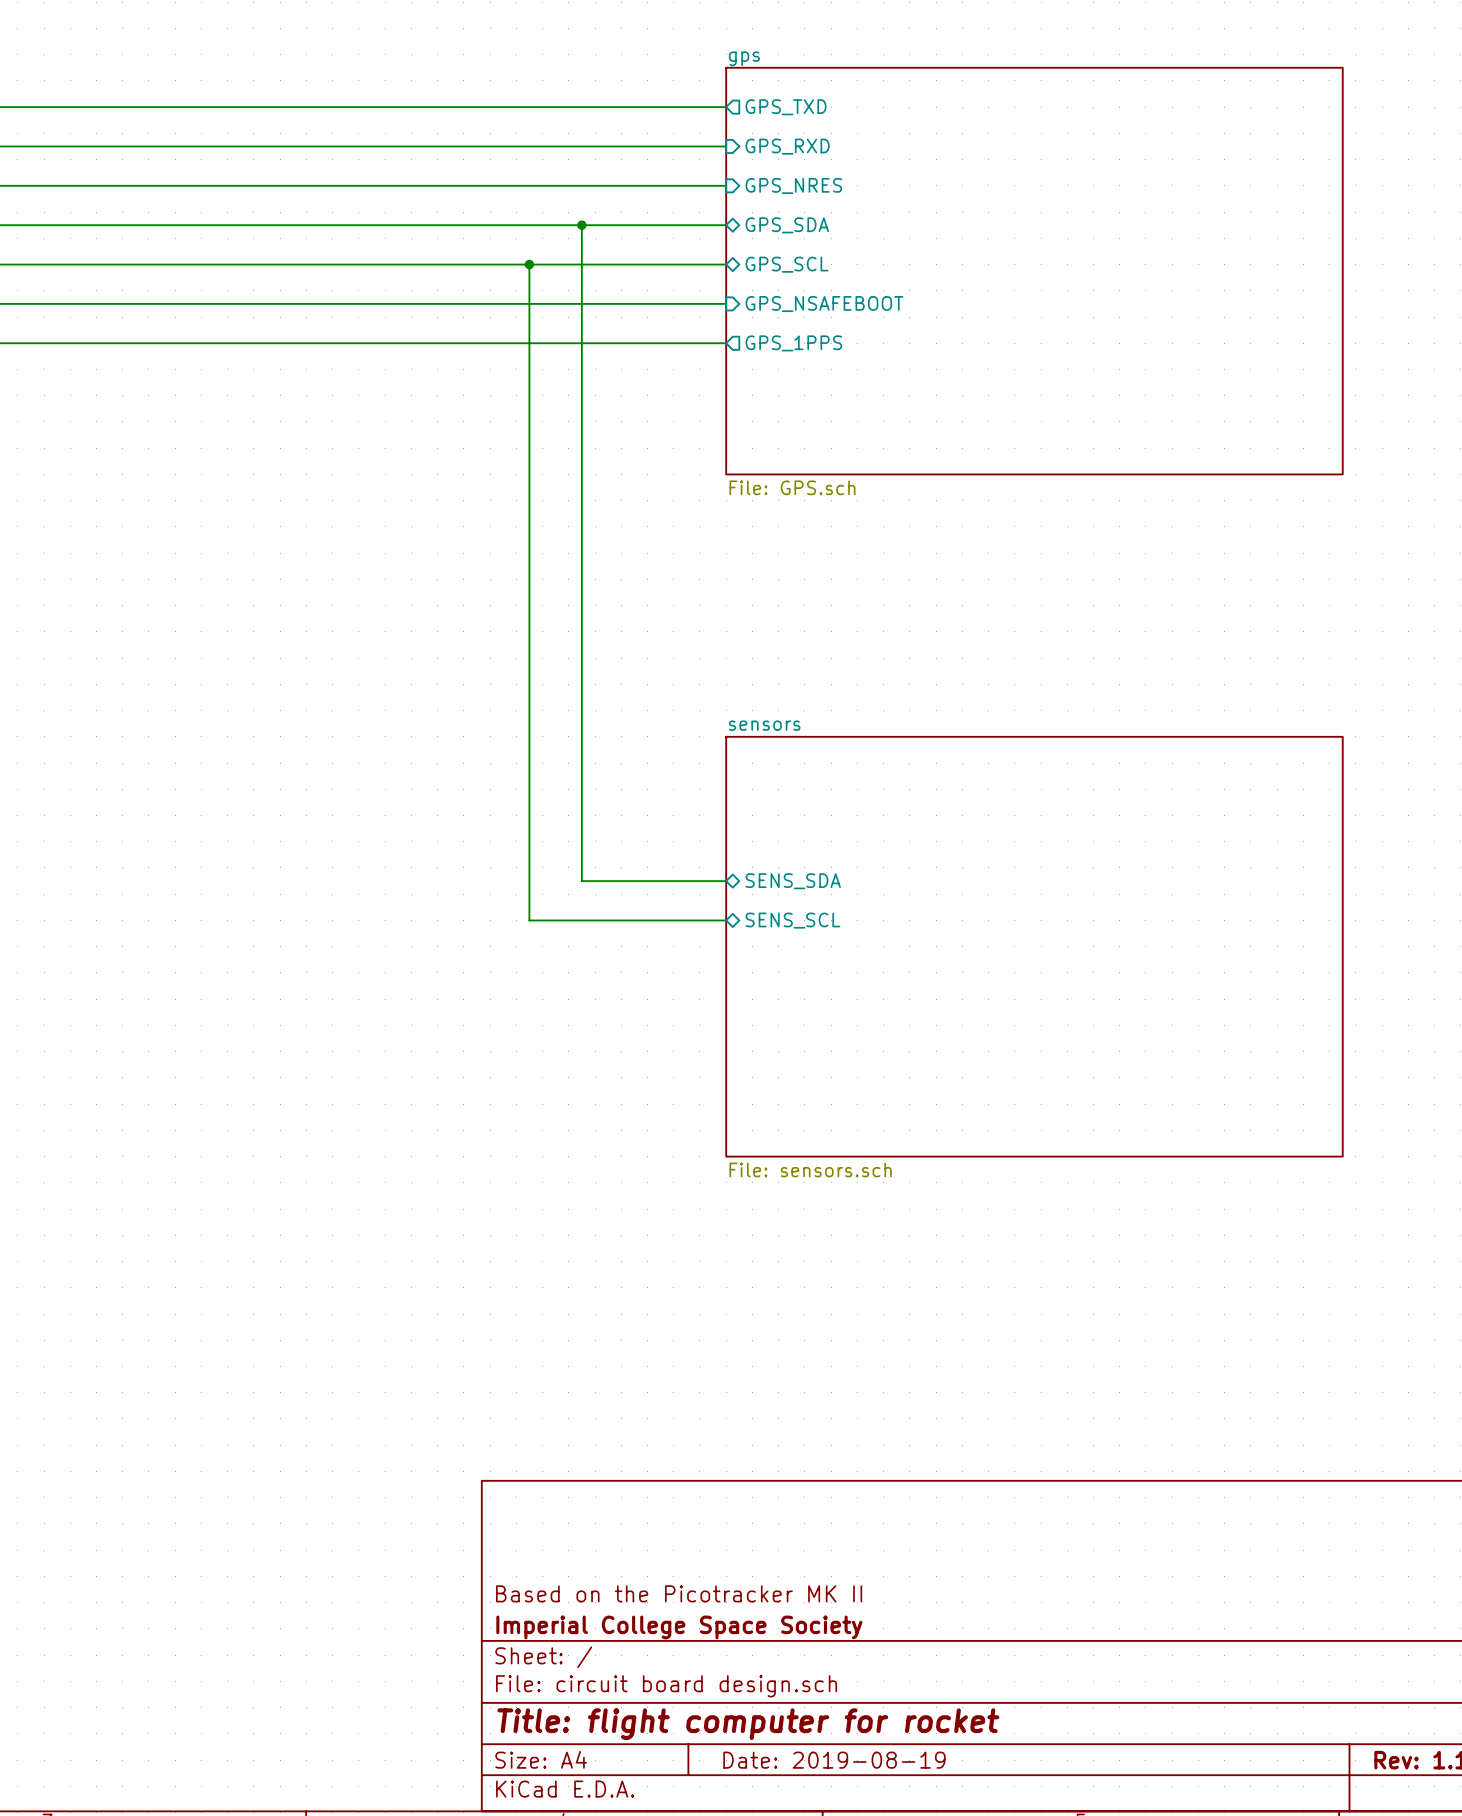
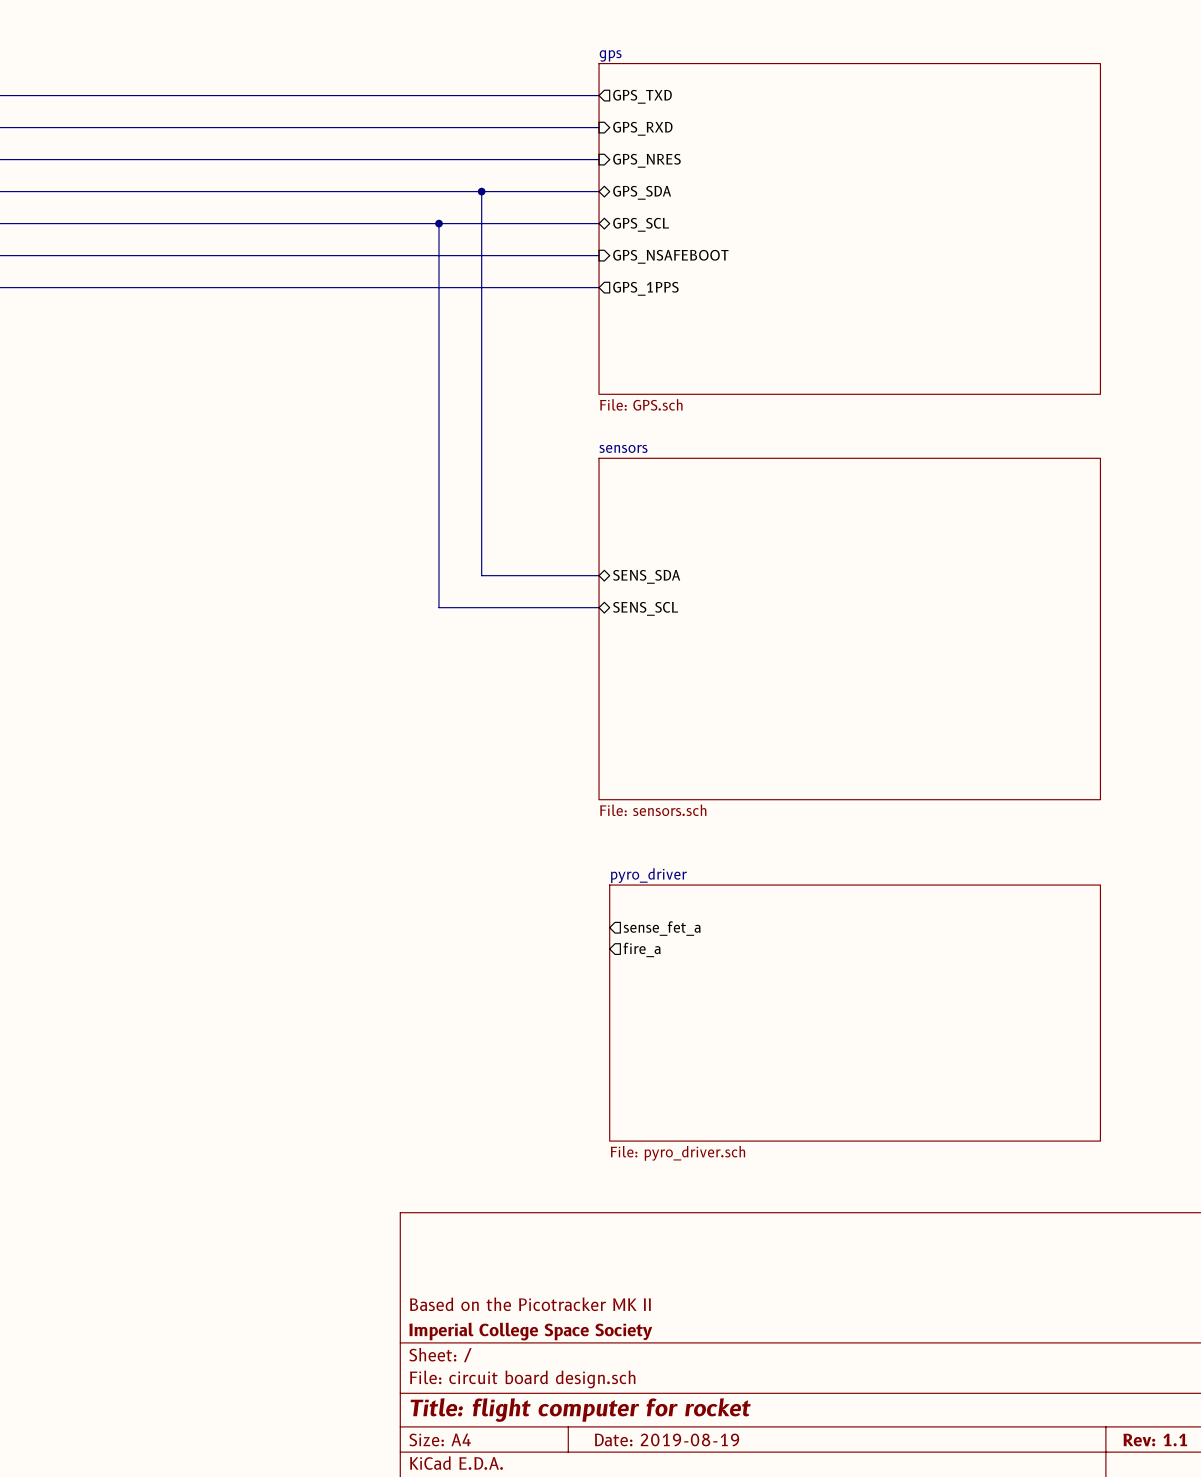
wire: (581, 697) (581, 881) (726, 881) -> (481, 575) (599, 575)
wire: (529, 736) (529, 920) (726, 920) -> (439, 607) (599, 607)
sheet pin position: SENS_SDA (793, 881) -> SENS_SDA (646, 576)
sheet pin position: SENS_SCL (792, 920) -> SENS_SCL (645, 608)
sheet sensors position: (1034, 946) -> (849, 629)
sheet pin: none -> sense_fet_a (662, 928)
sheet pin: none -> fire_a (642, 949)
sheet pyro_driver: none -> File: pyro_driver.sch (855, 1013)

